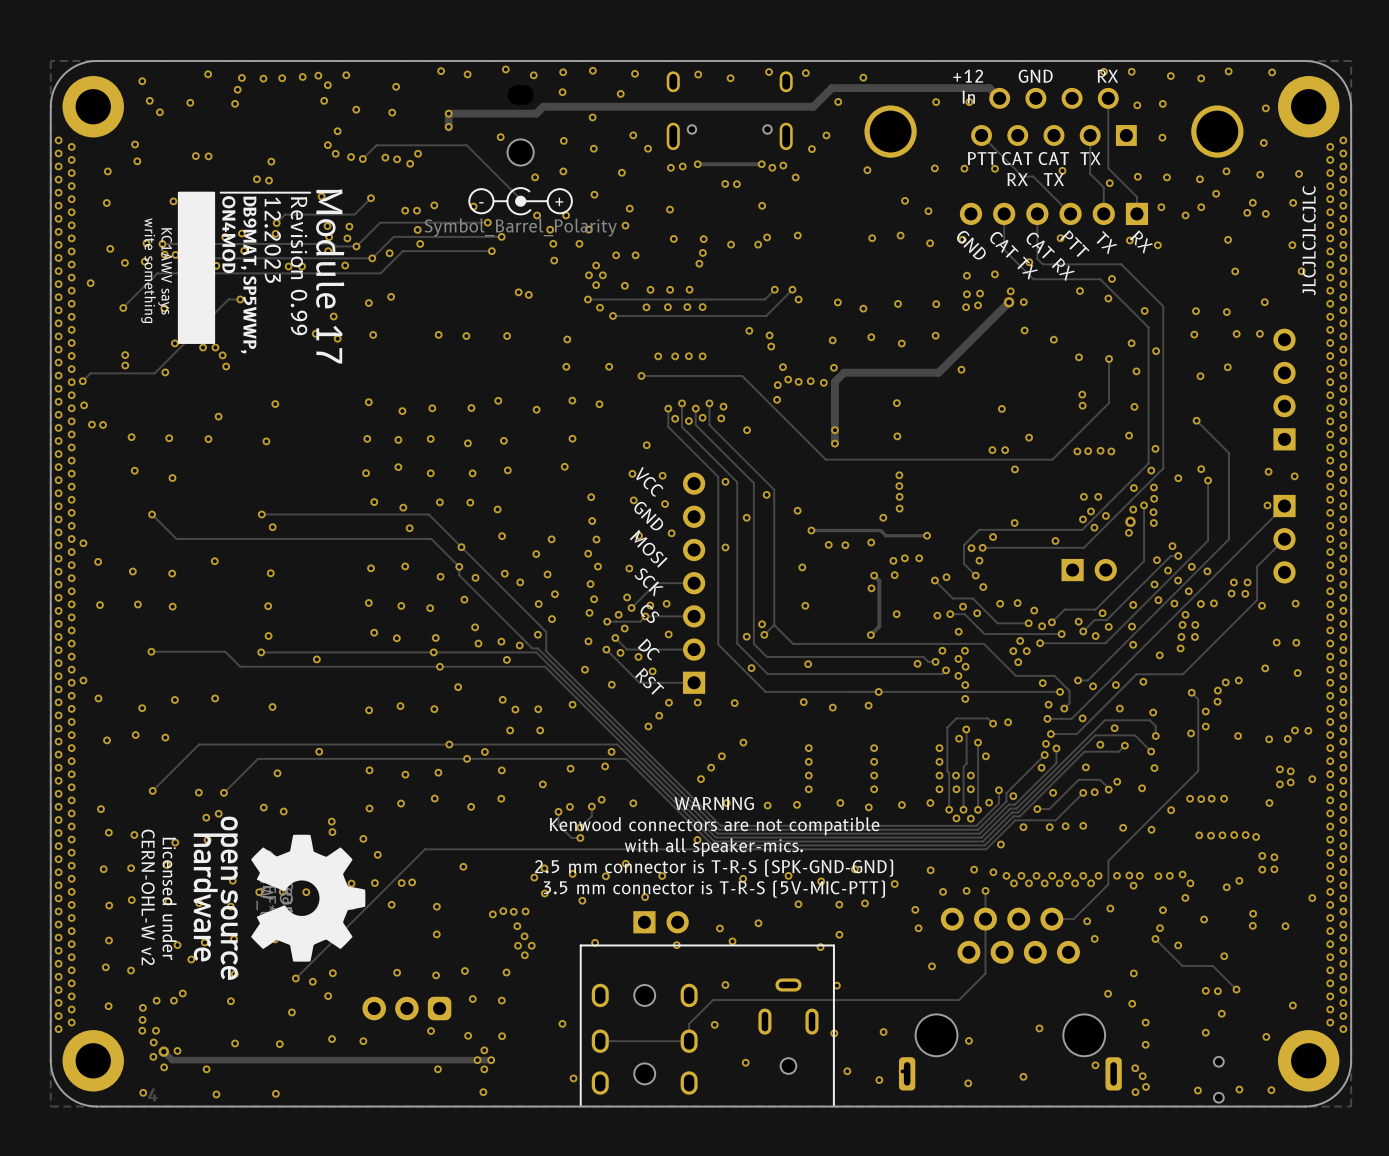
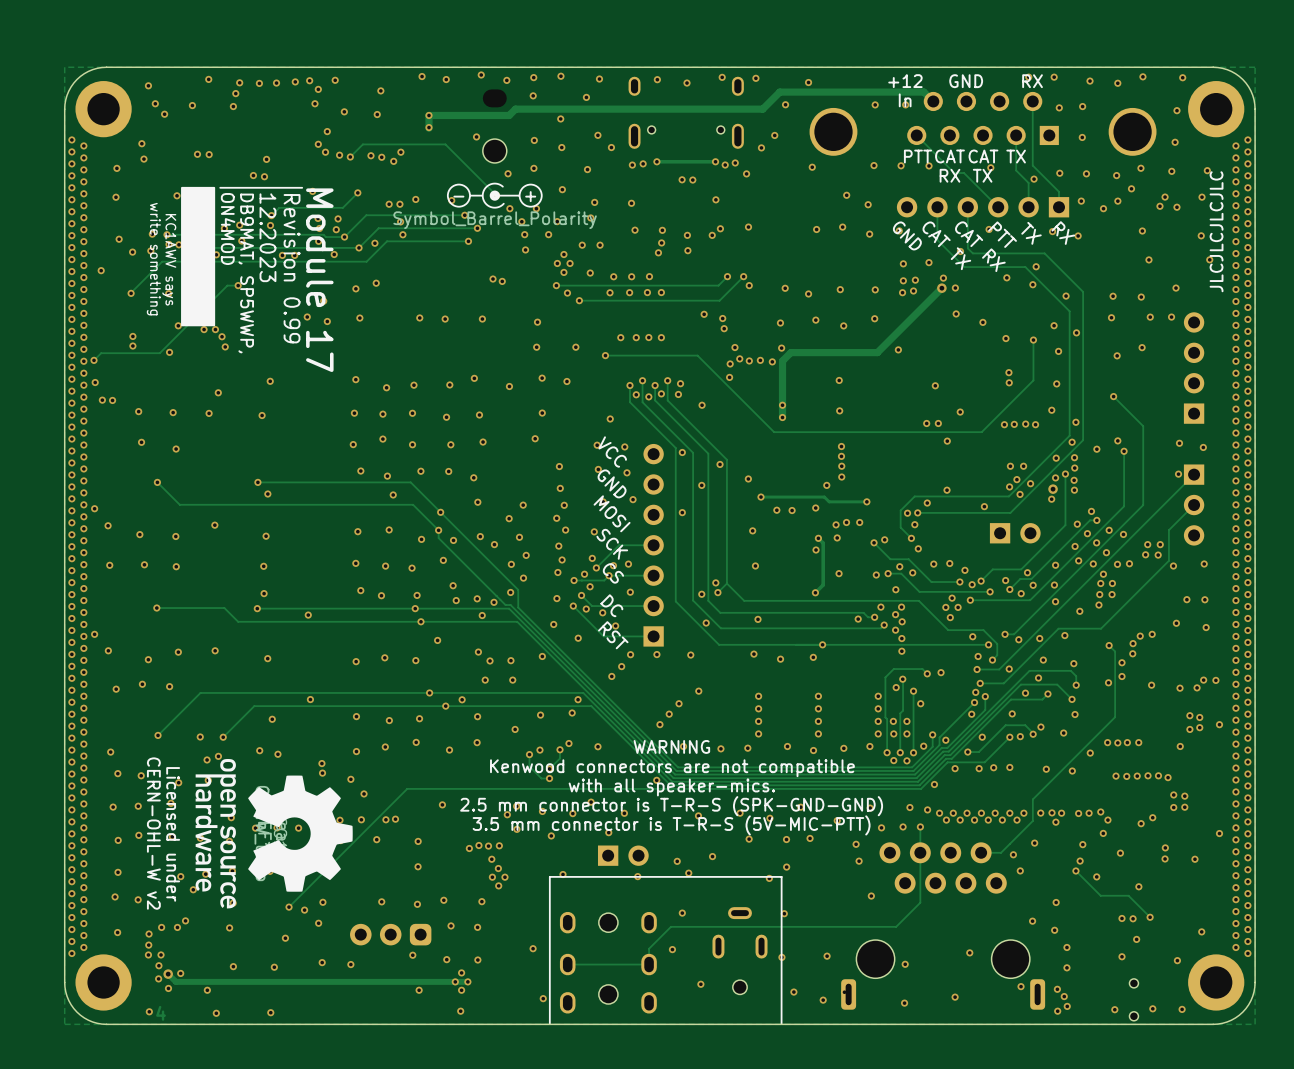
via: none -> (687, 250)

